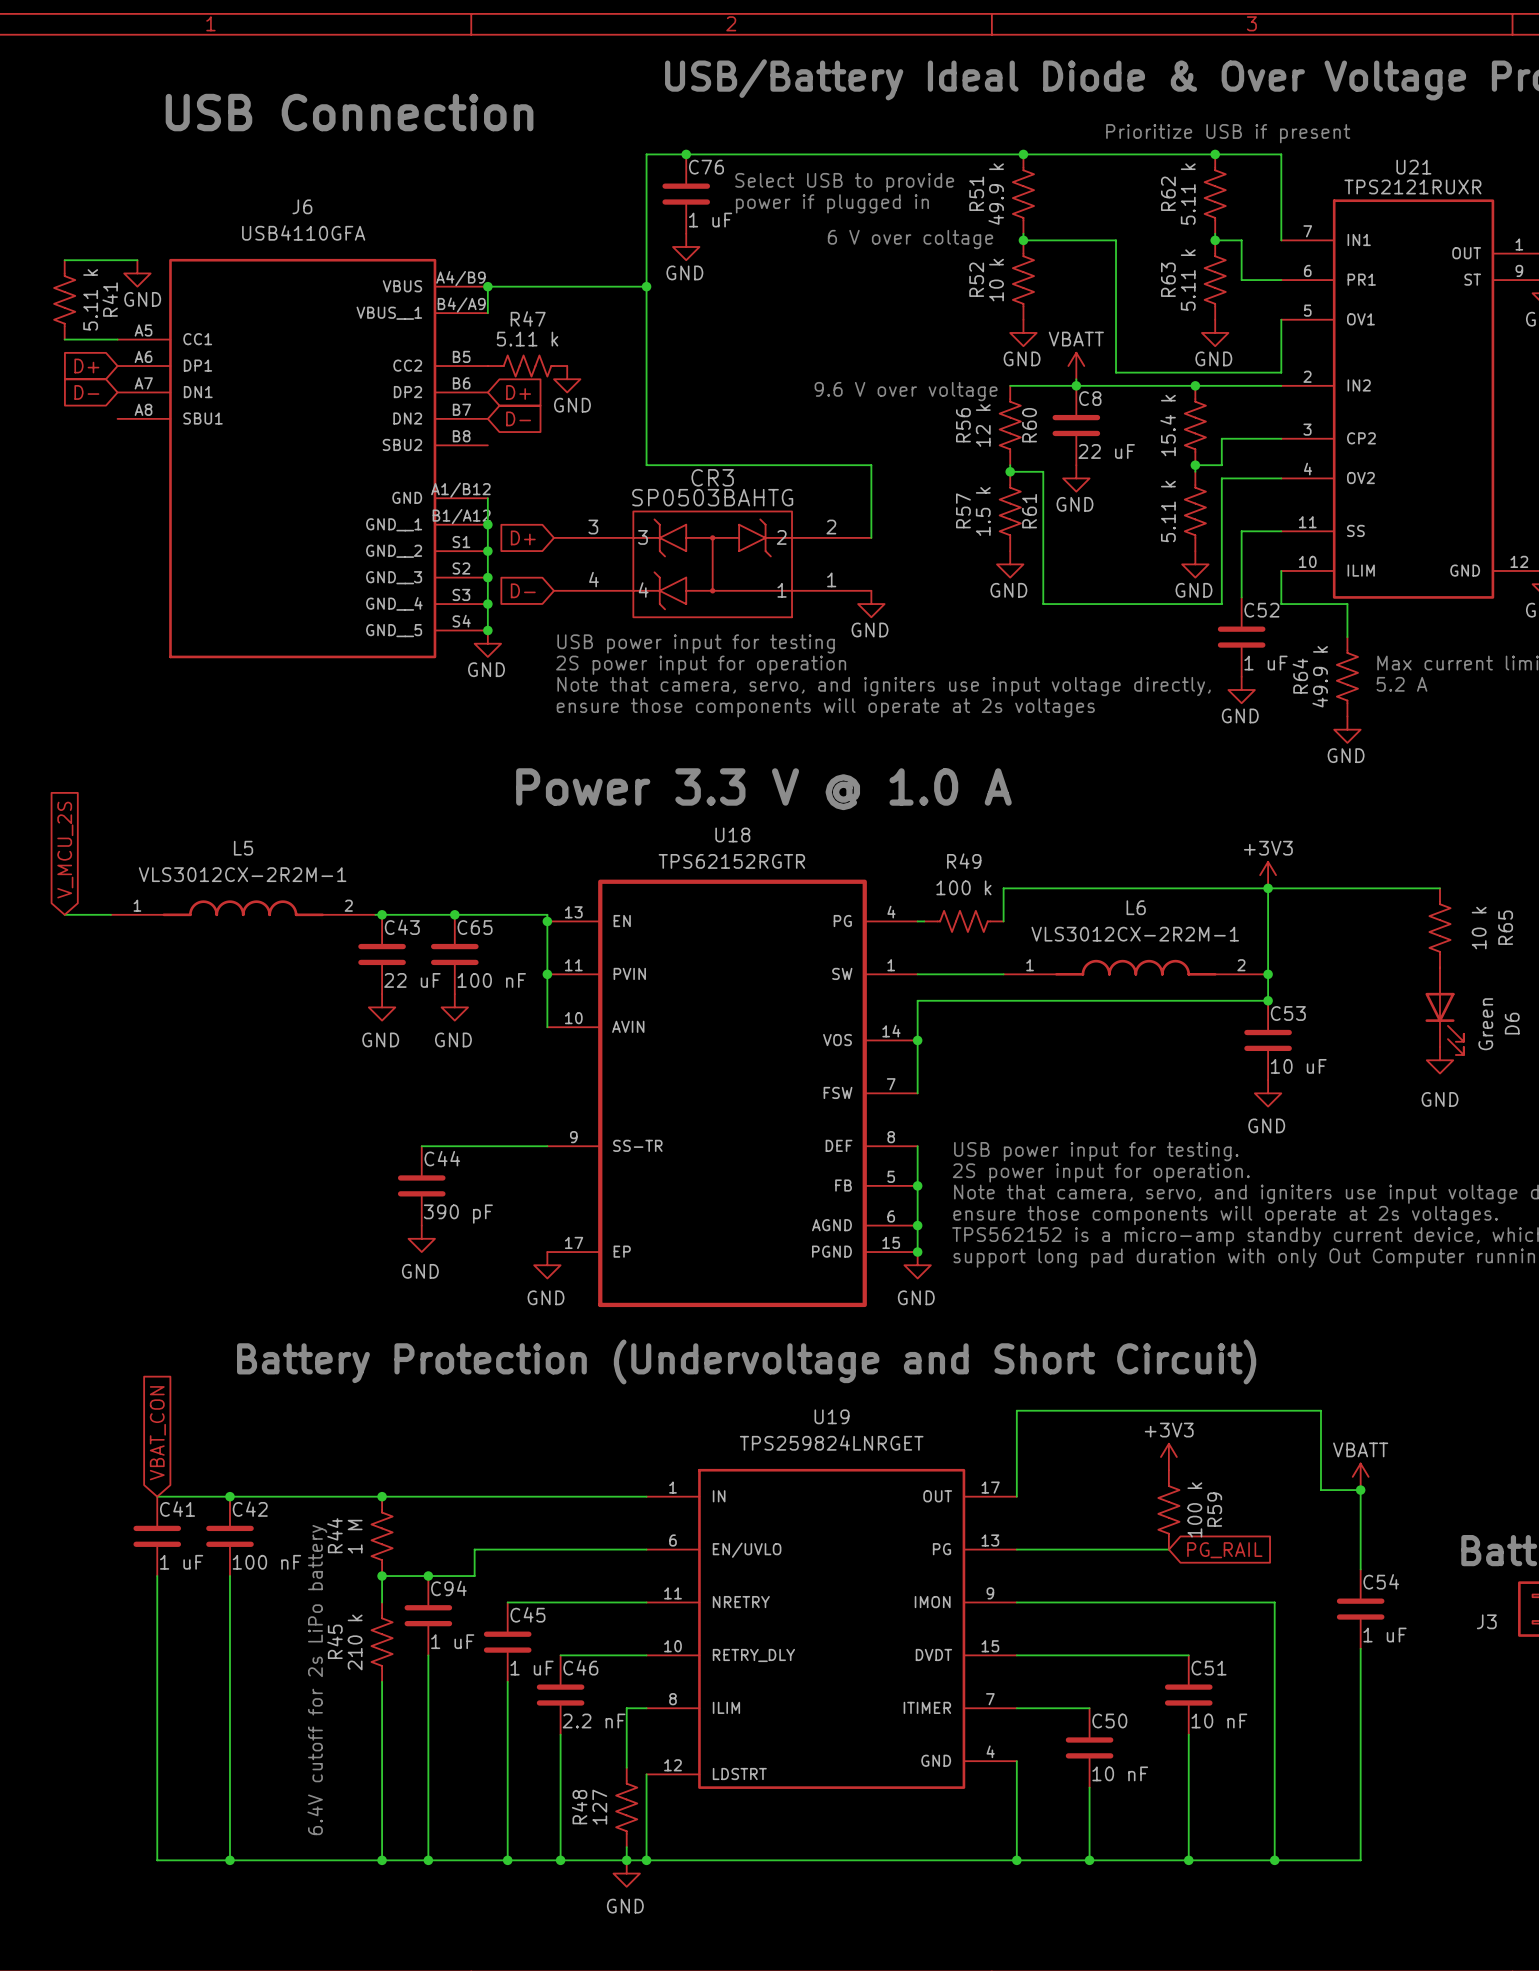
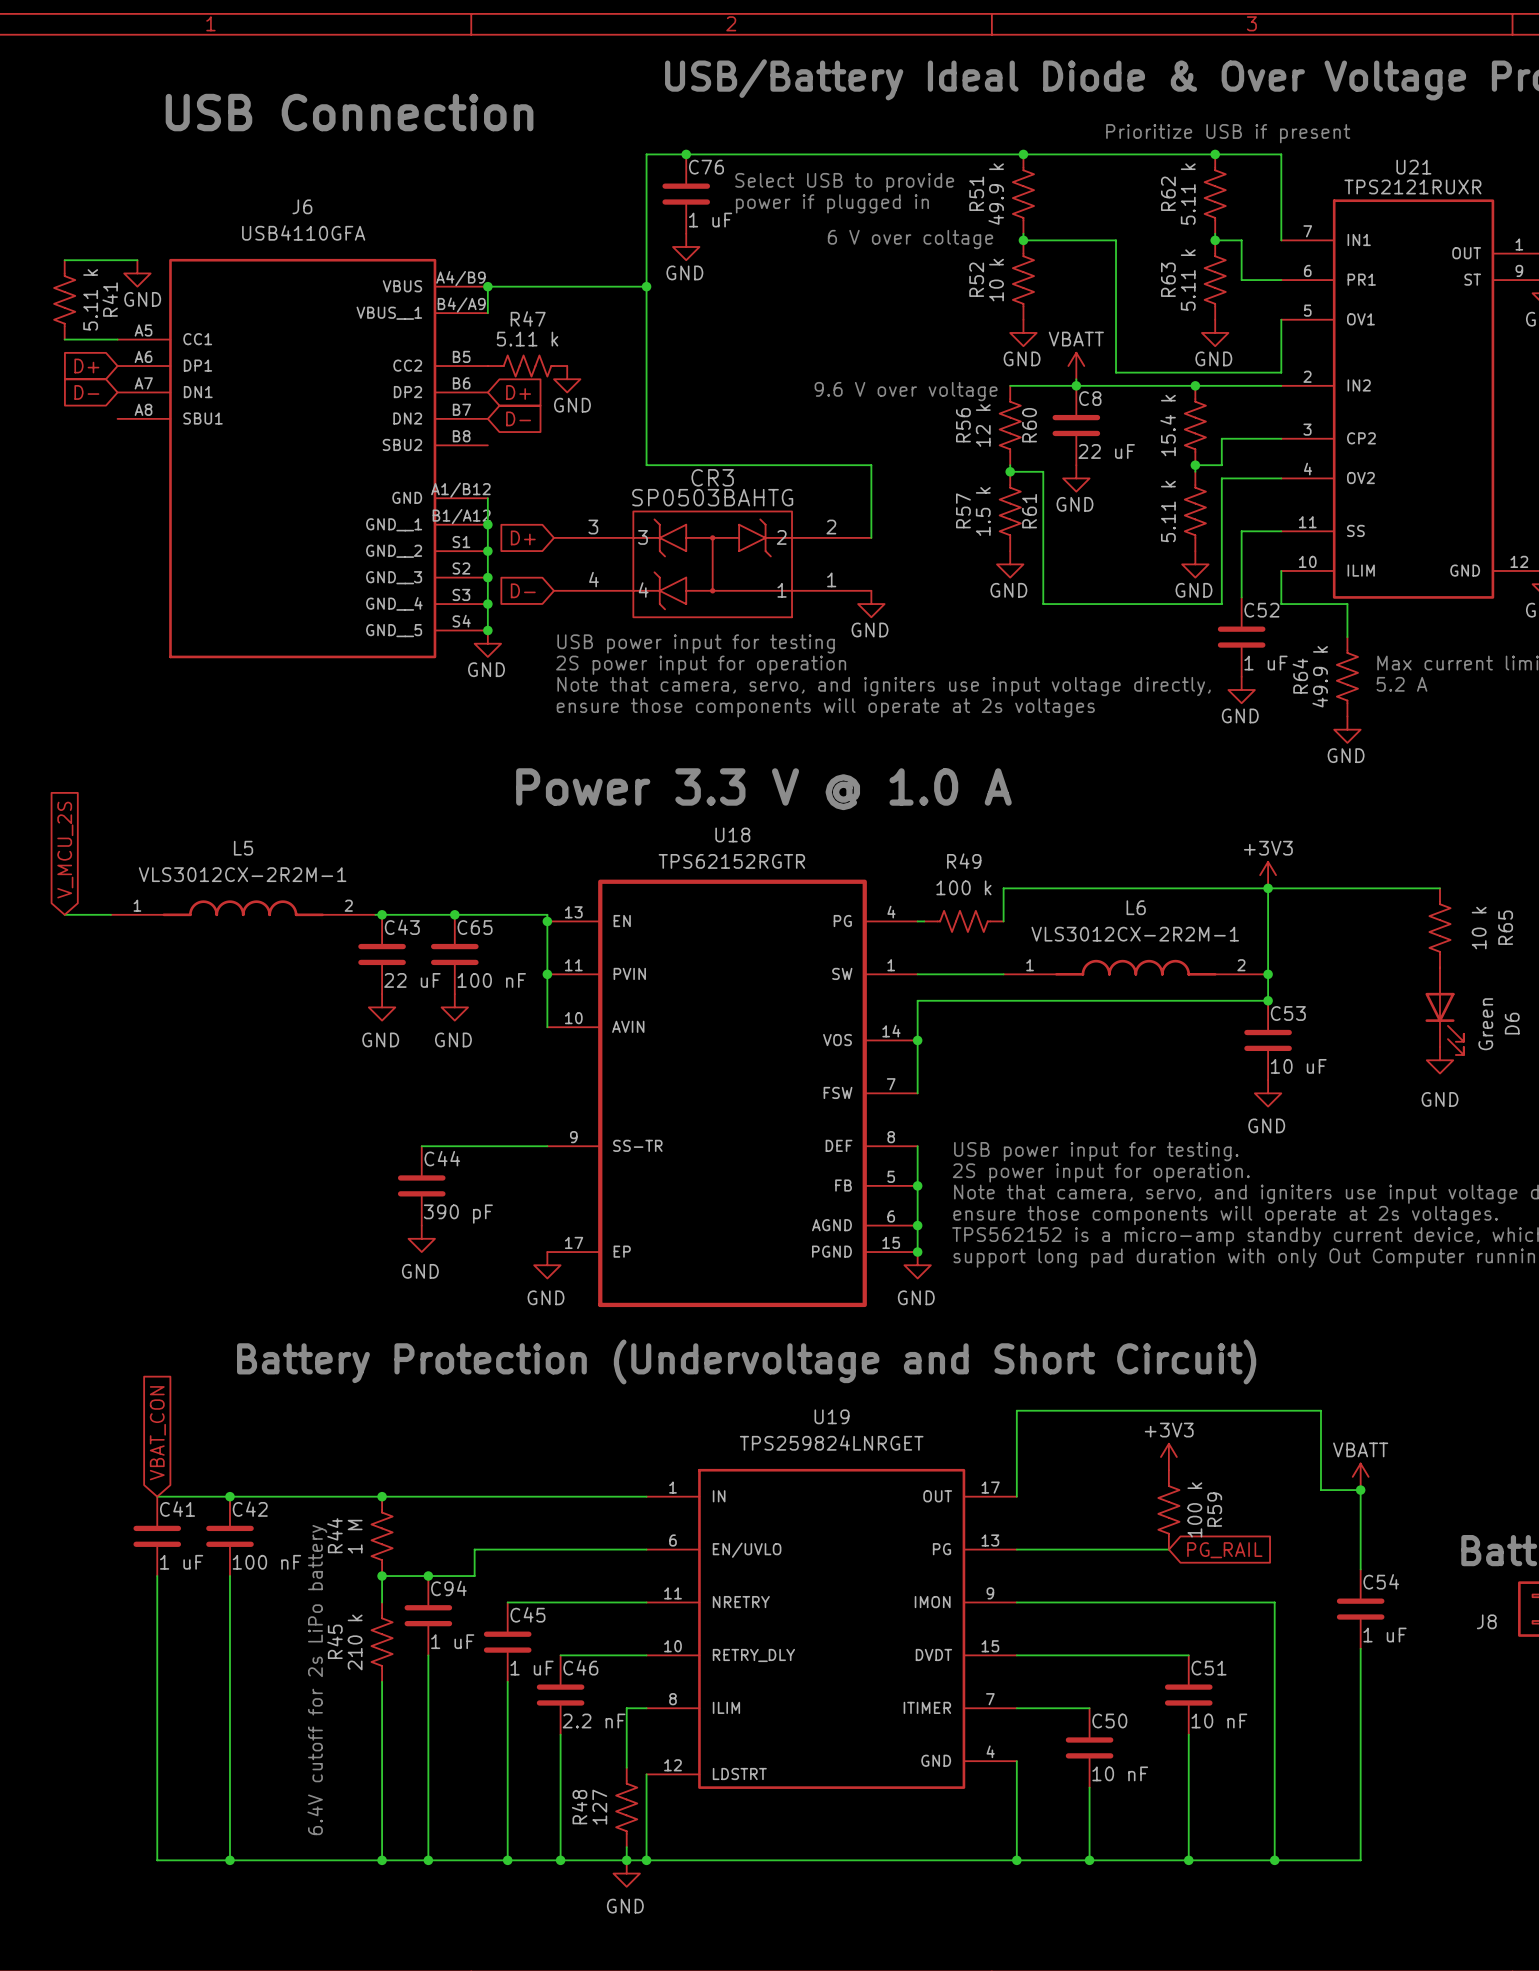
J3 name: J3 (1486, 1621) -> J8 (1486, 1621)

